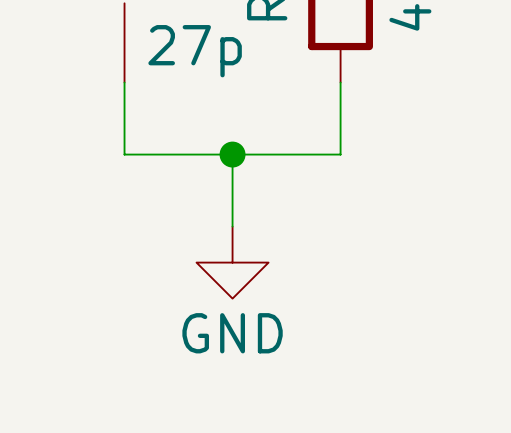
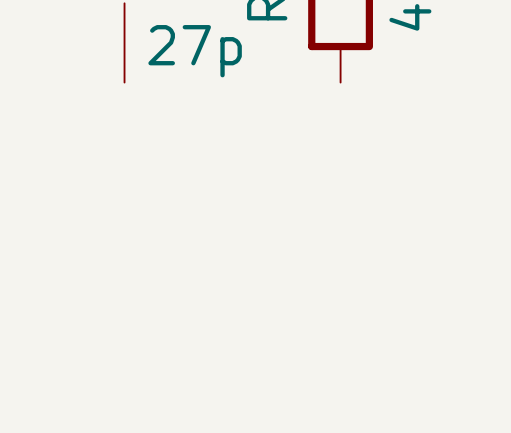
wire: (124, 82) (124, 154) (340, 154) (340, 82) -> none
wire: (232, 154) (232, 226) -> none
junction: (232, 154) -> none
power symbol: GND (232, 262) -> none

